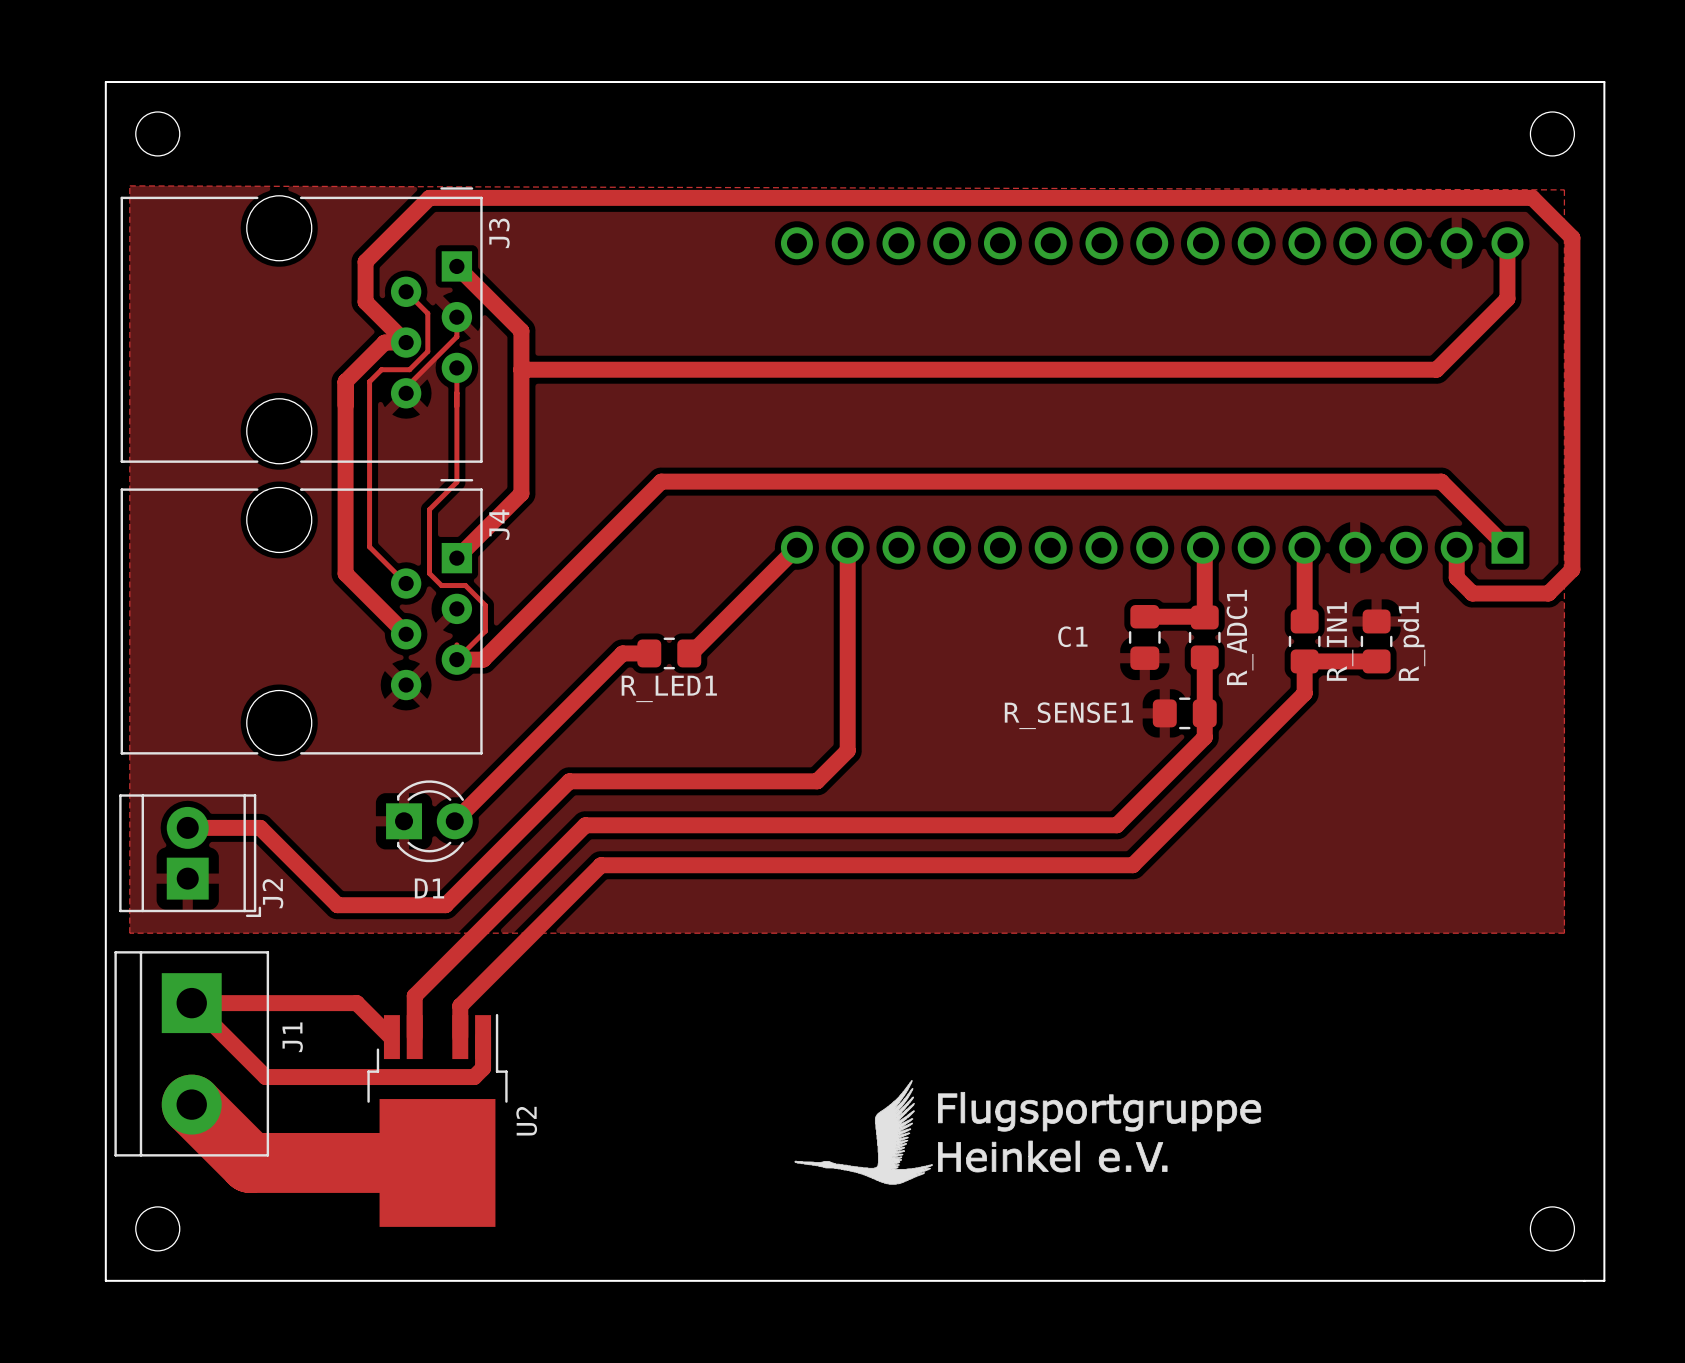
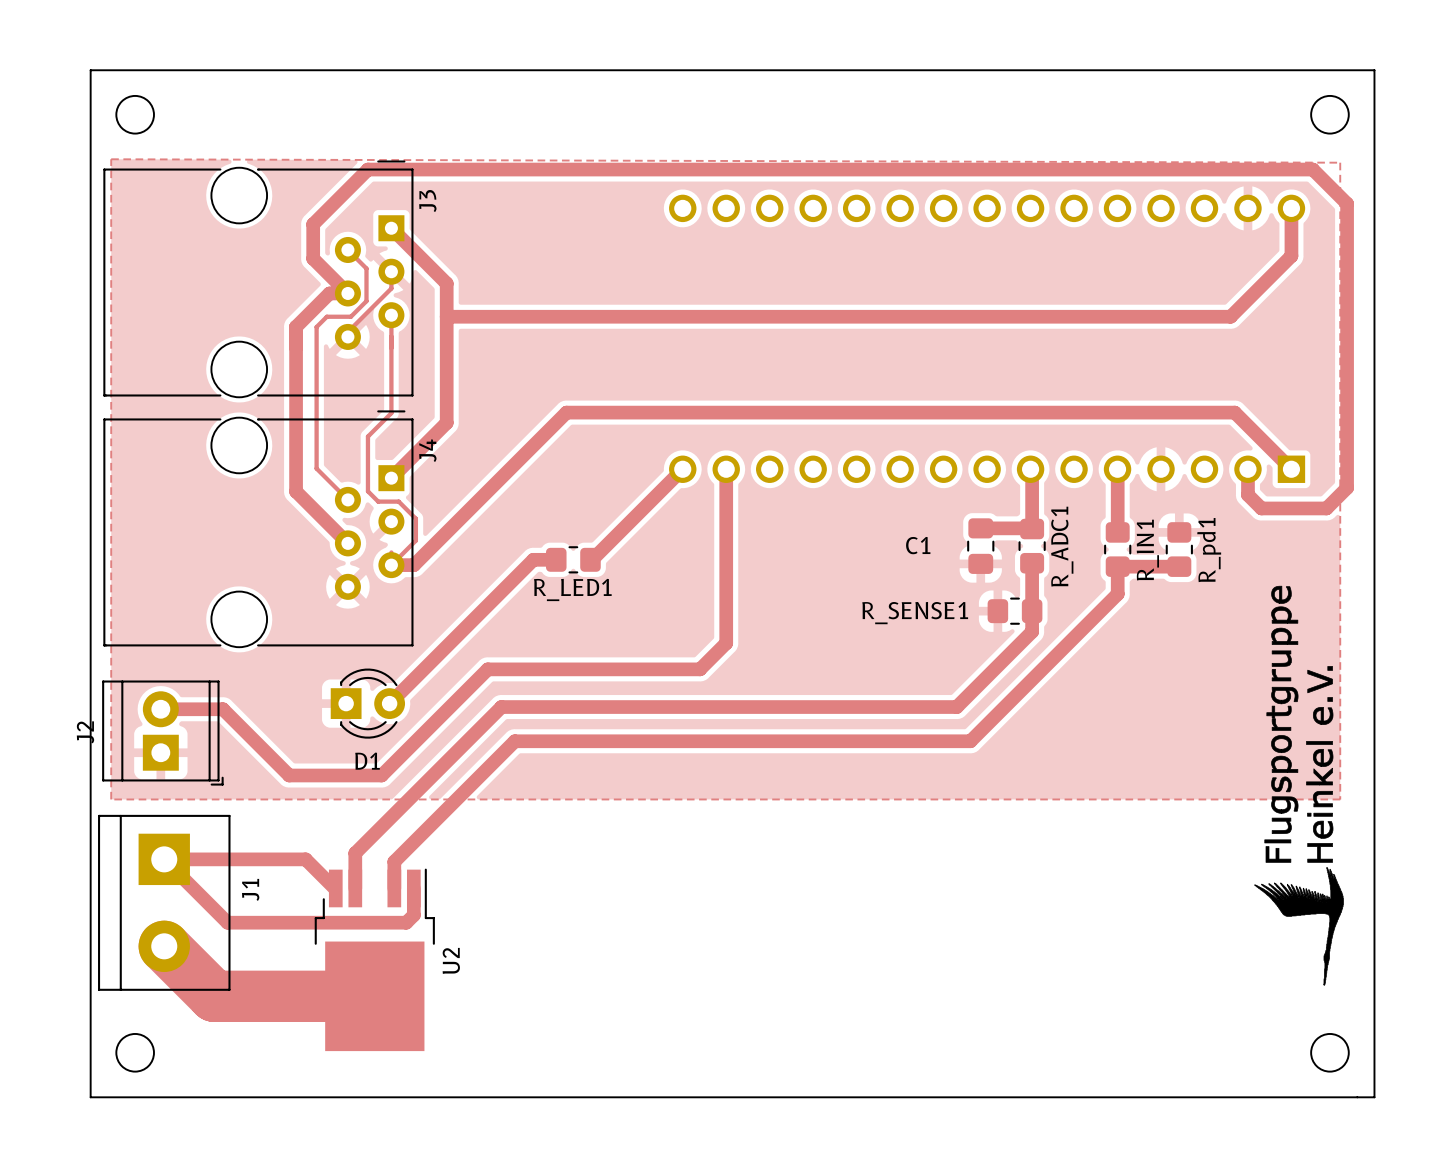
drawing: none -> [1254, 585, 1344, 986]
J2 name position: J2 (272, 893) -> J2 (85, 732)
drawing: [794, 1080, 1262, 1185] -> none

